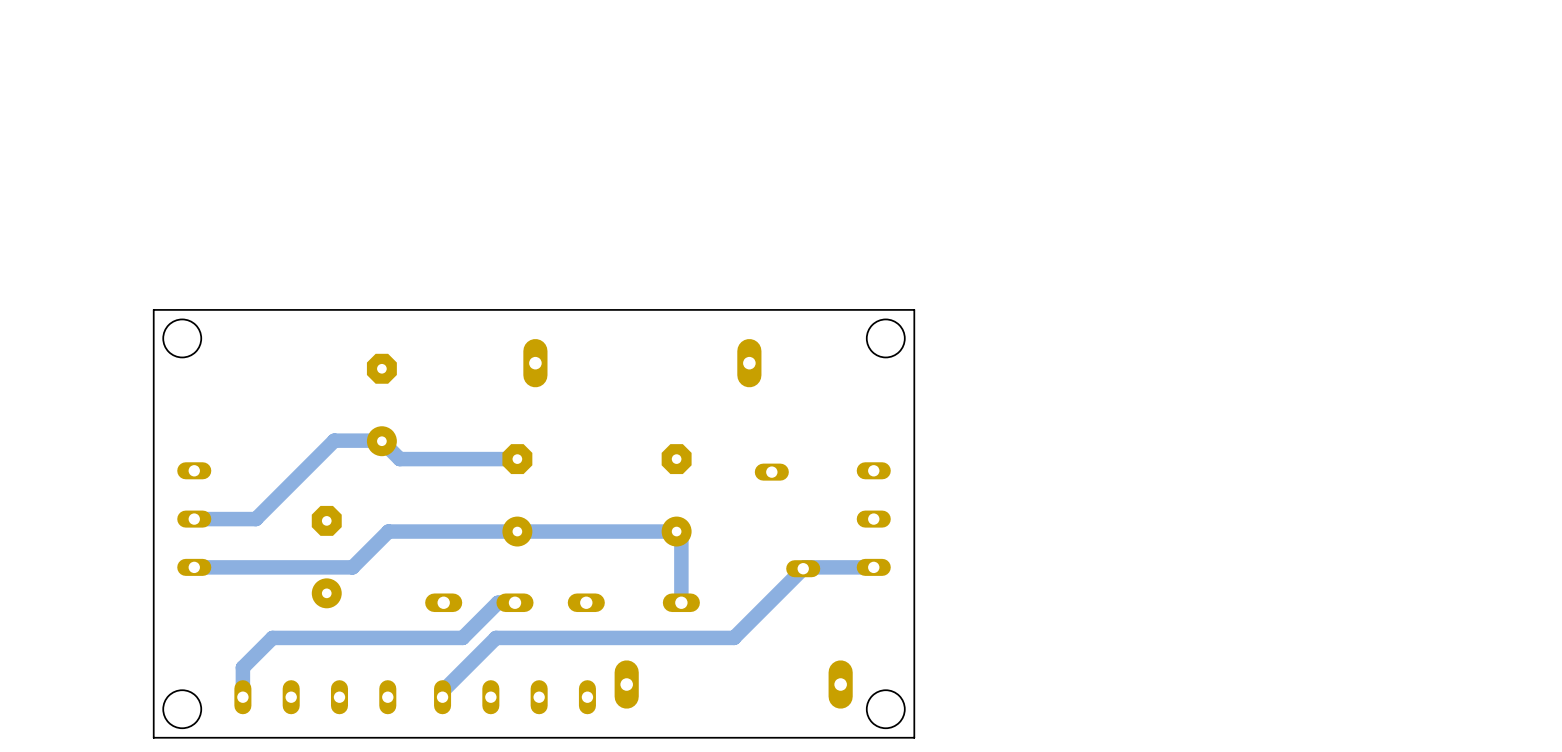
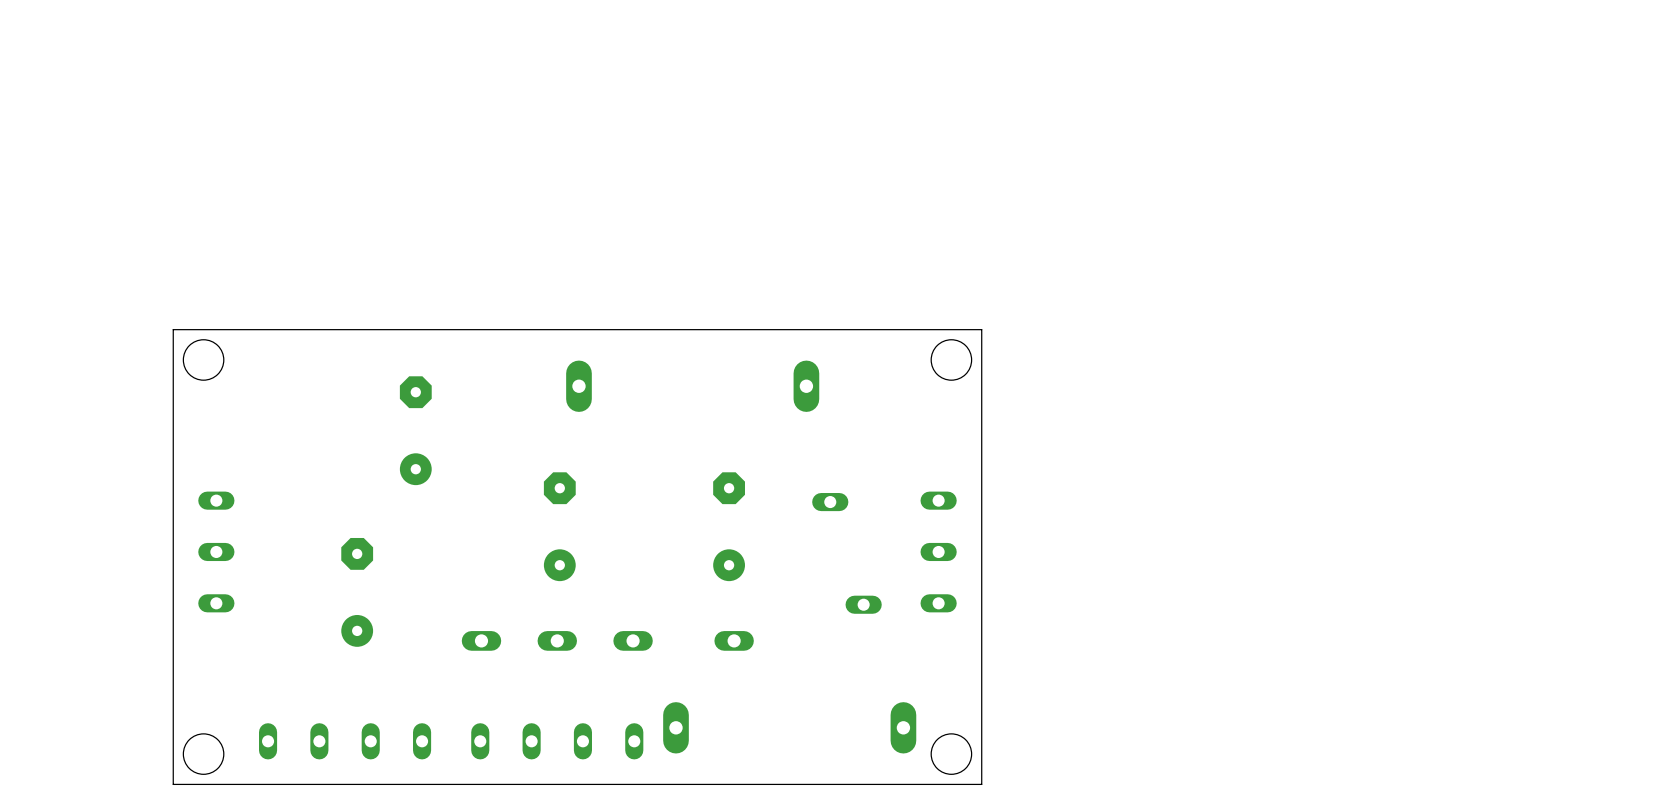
track: (517, 459) (399, 459) (381, 440) (334, 440) (255, 519) (194, 519) -> none
track: (194, 567) (352, 567) (388, 531) (676, 531) (681, 536) (681, 602) -> none
track: (873, 567) (804, 567) (734, 637) (495, 637) (442, 691) (442, 697) -> none
track: (515, 602) (497, 602) (462, 637) (272, 637) (242, 667) (242, 697) -> none

